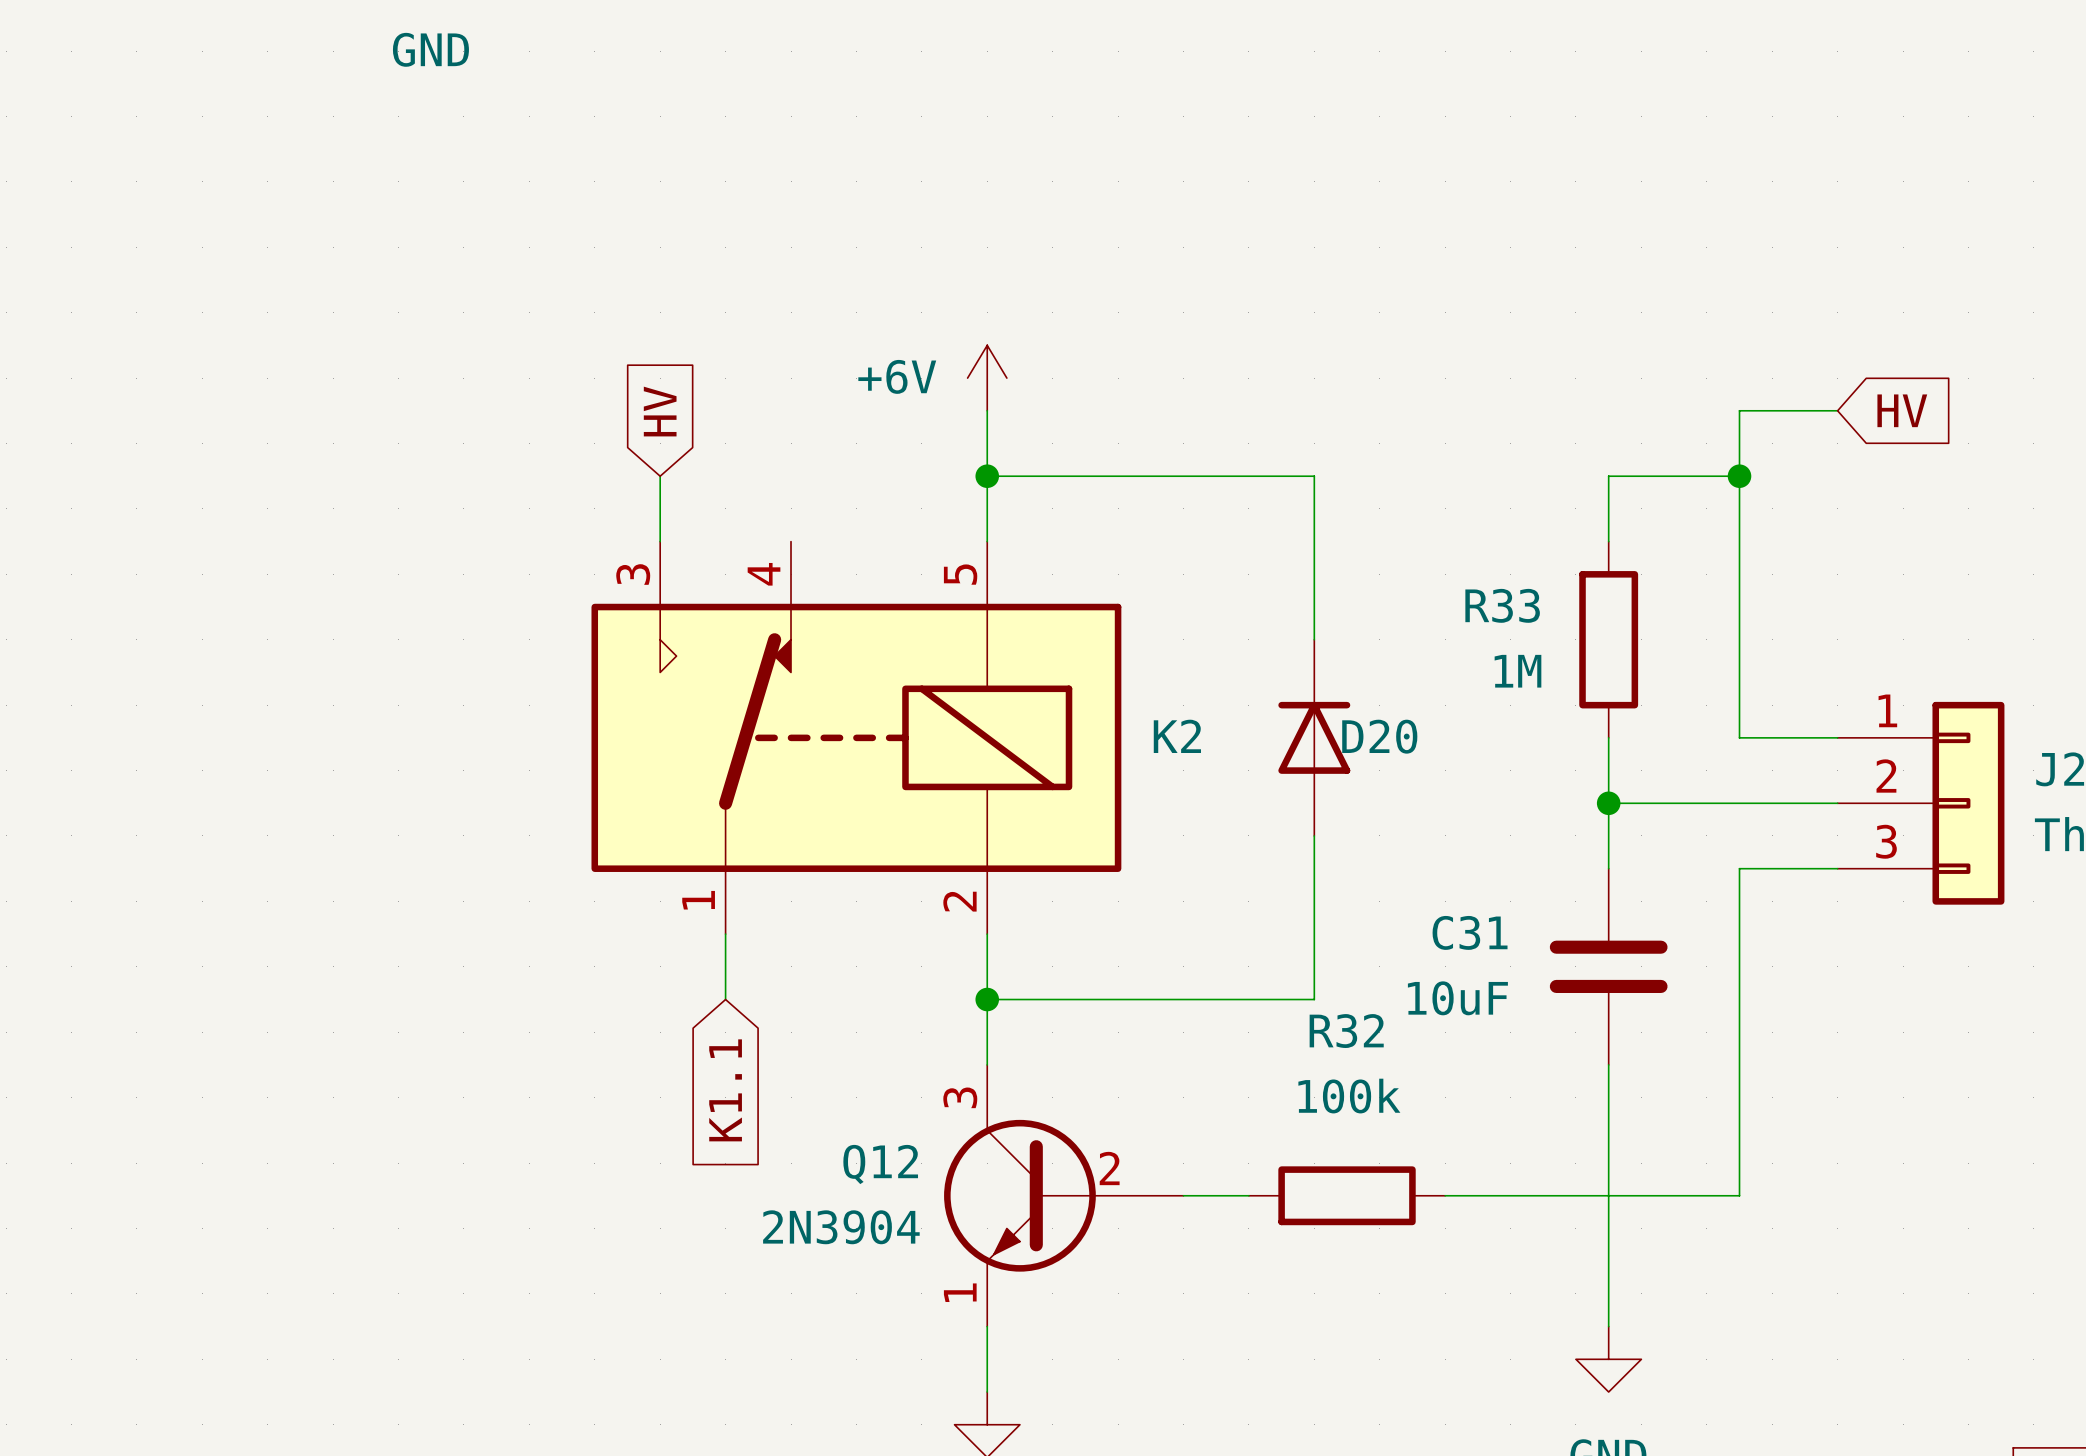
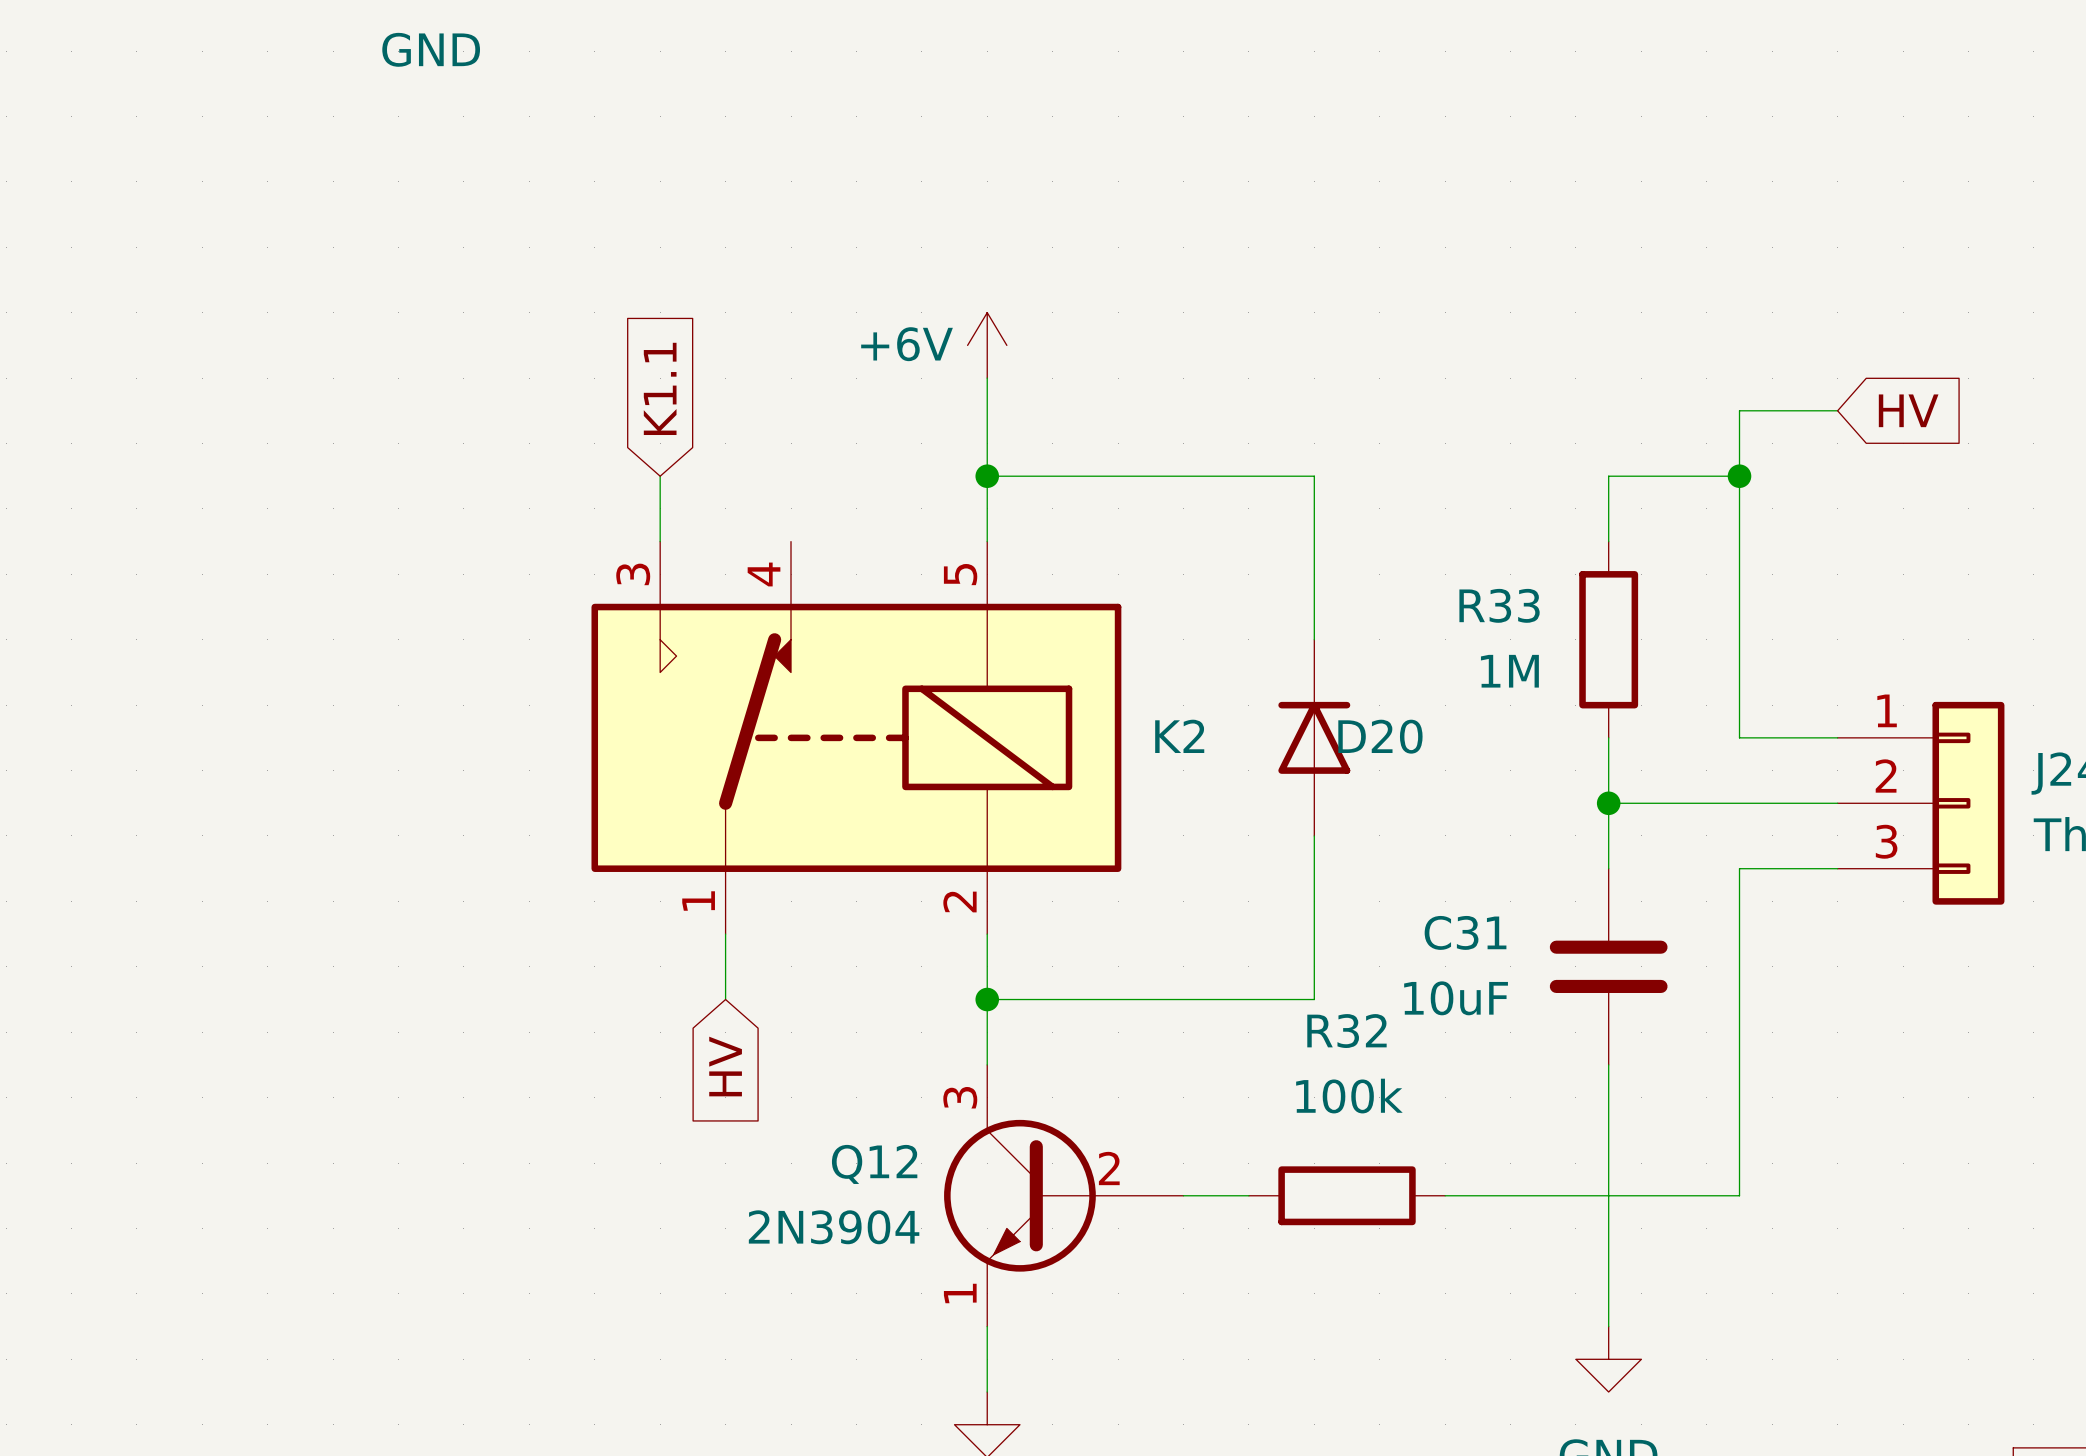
power symbol position: +6V (987, 378) -> +6V (987, 345)
global label: HV (660, 411) -> K1.1 (660, 388)
global label: K1.1 (725, 1090) -> HV (725, 1066)

